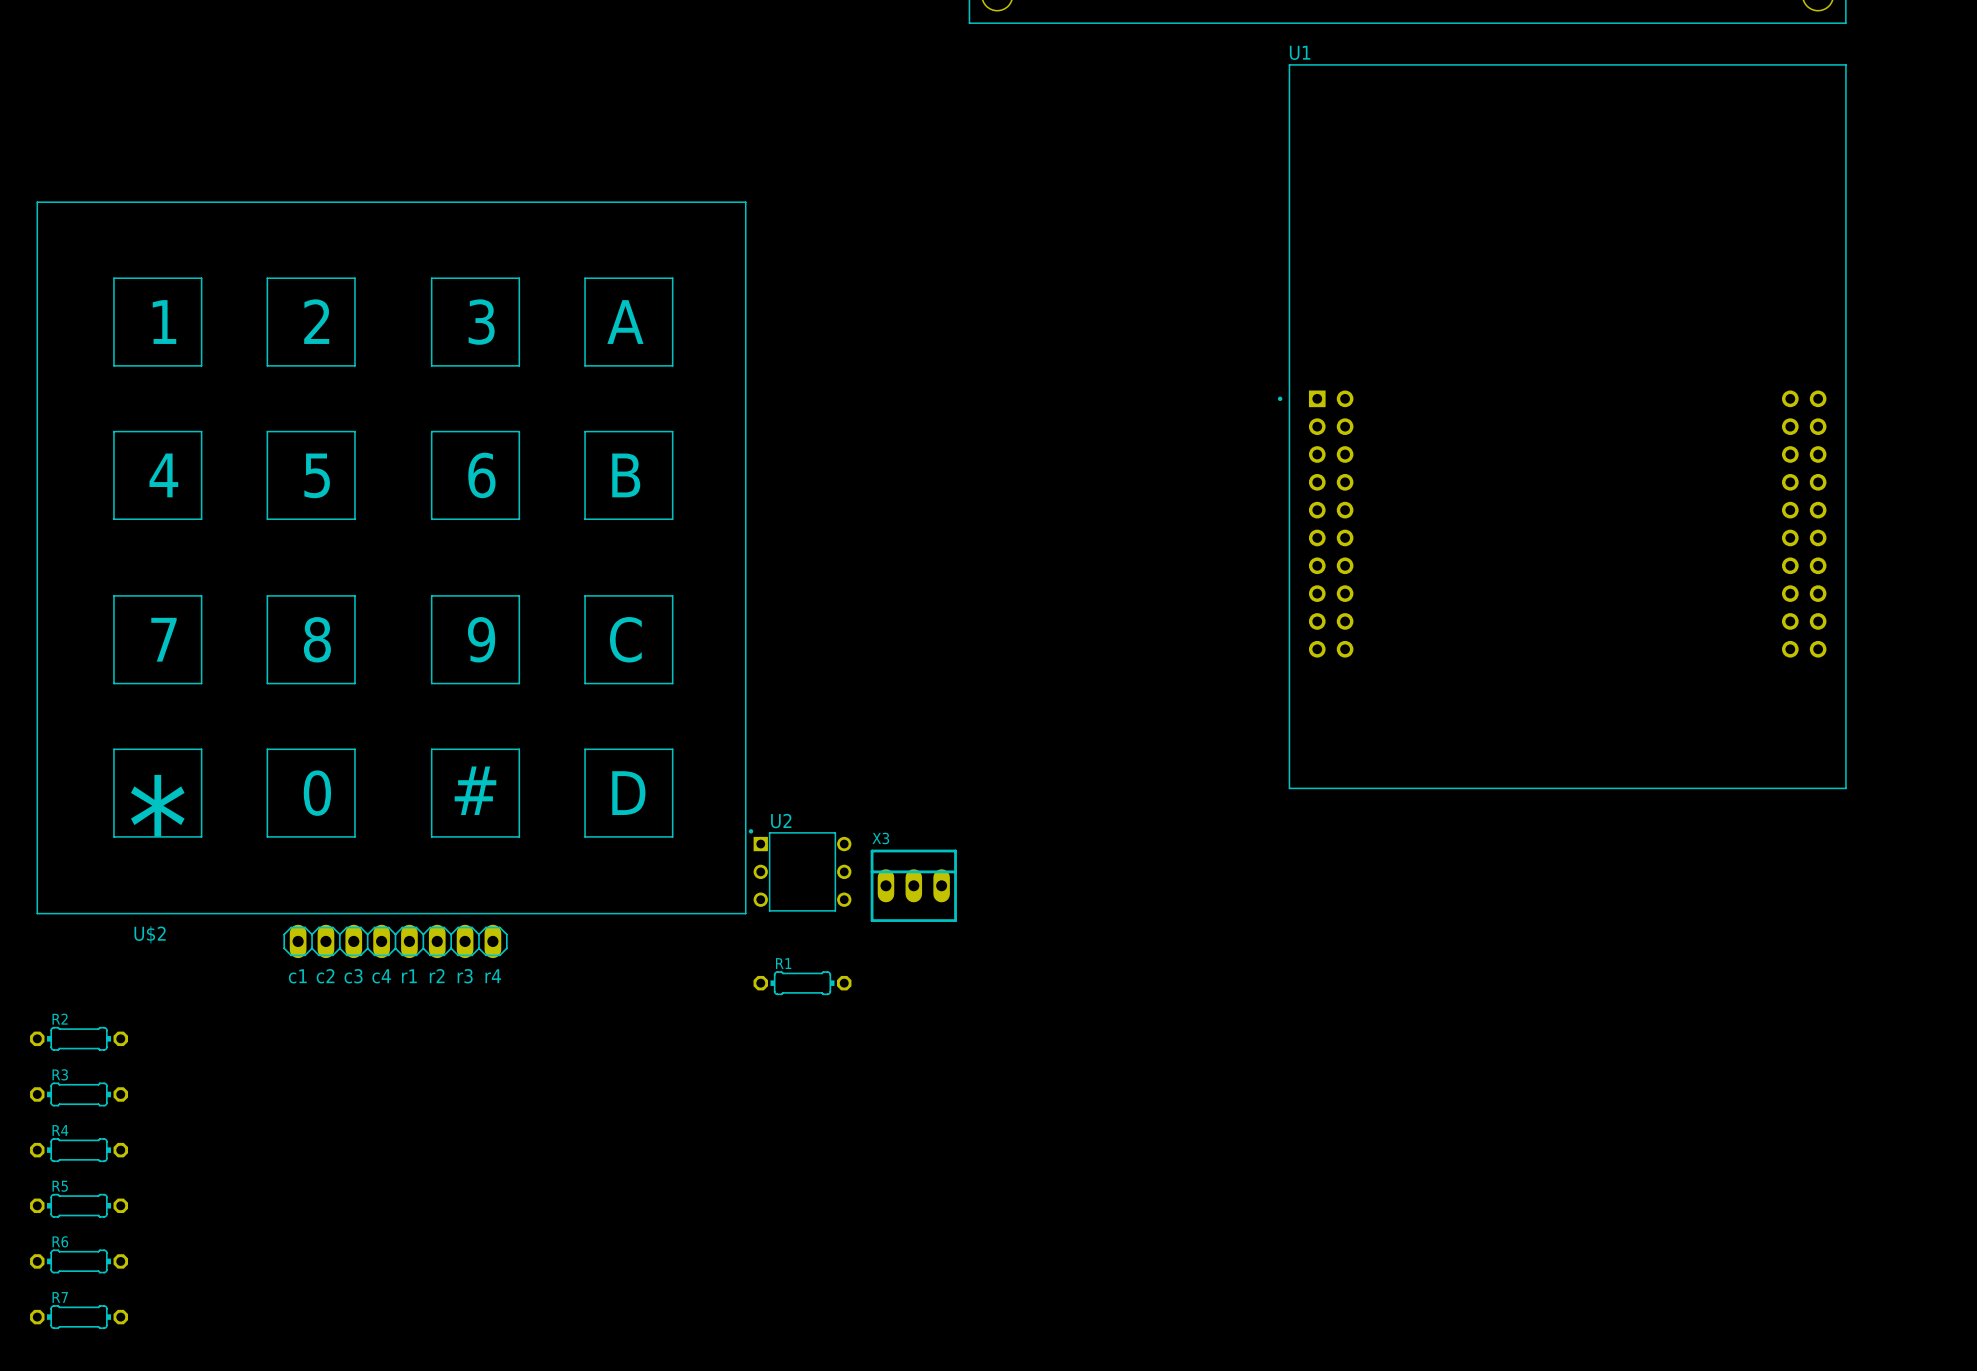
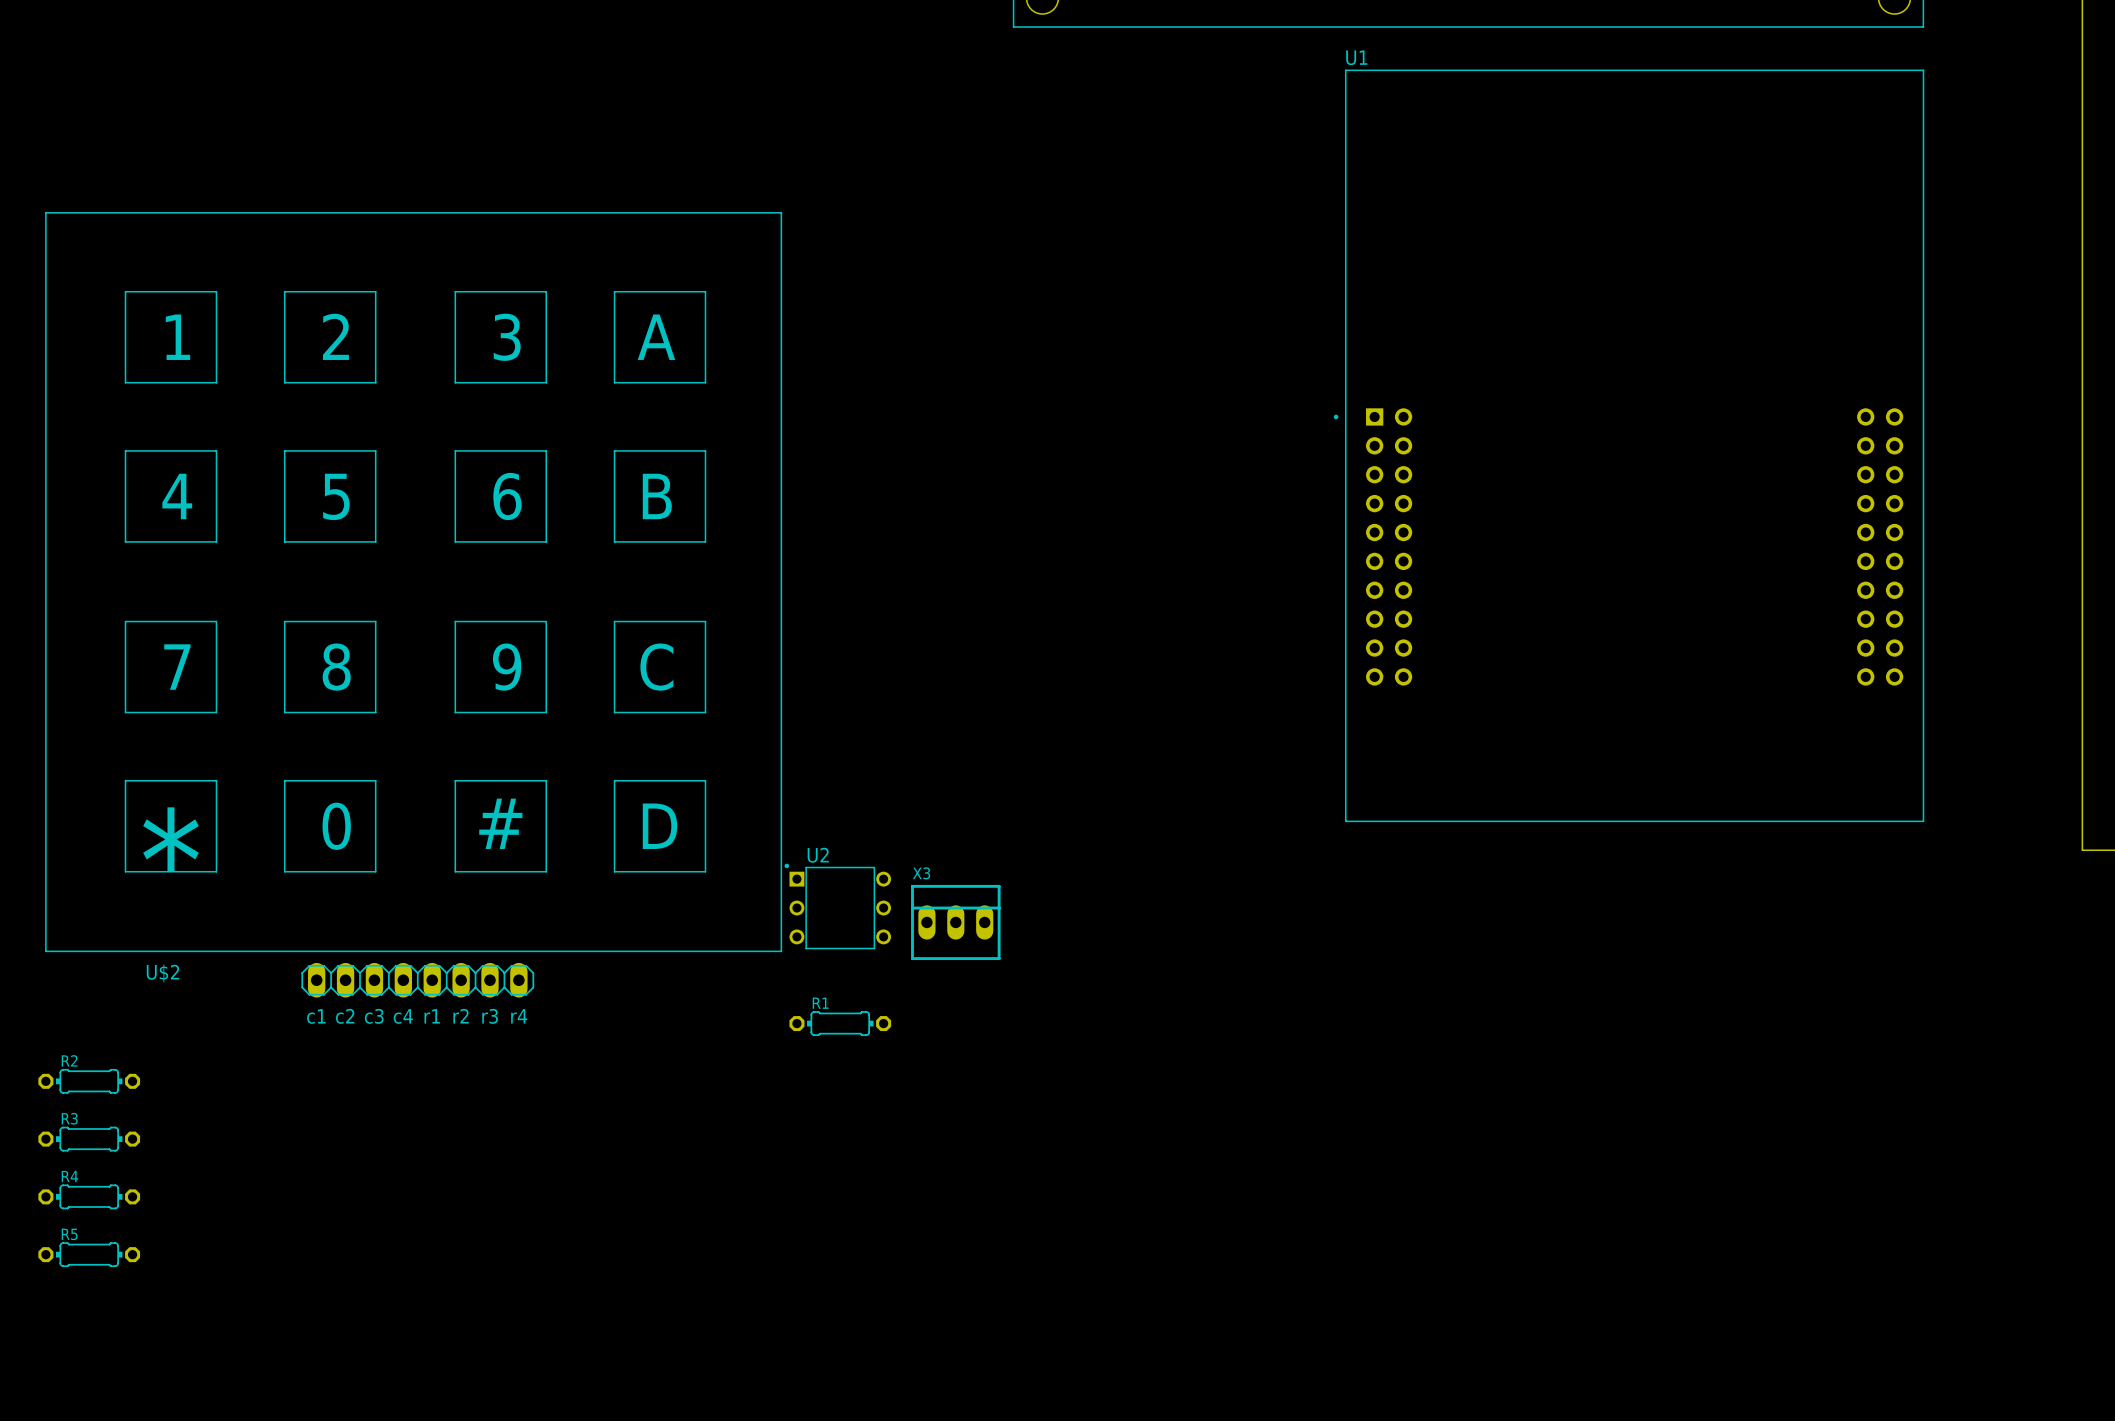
R6: (79, 1261) -> none
R7: (79, 1317) -> none

